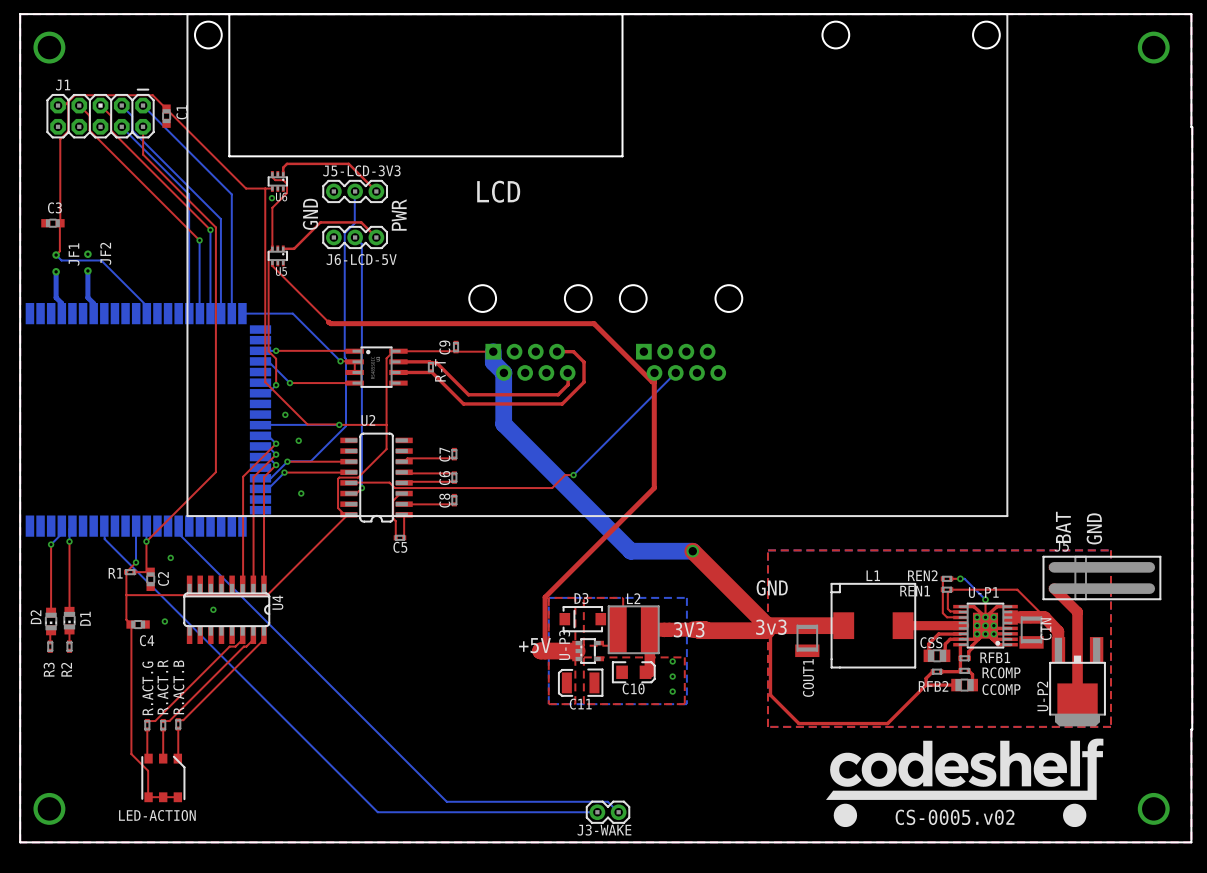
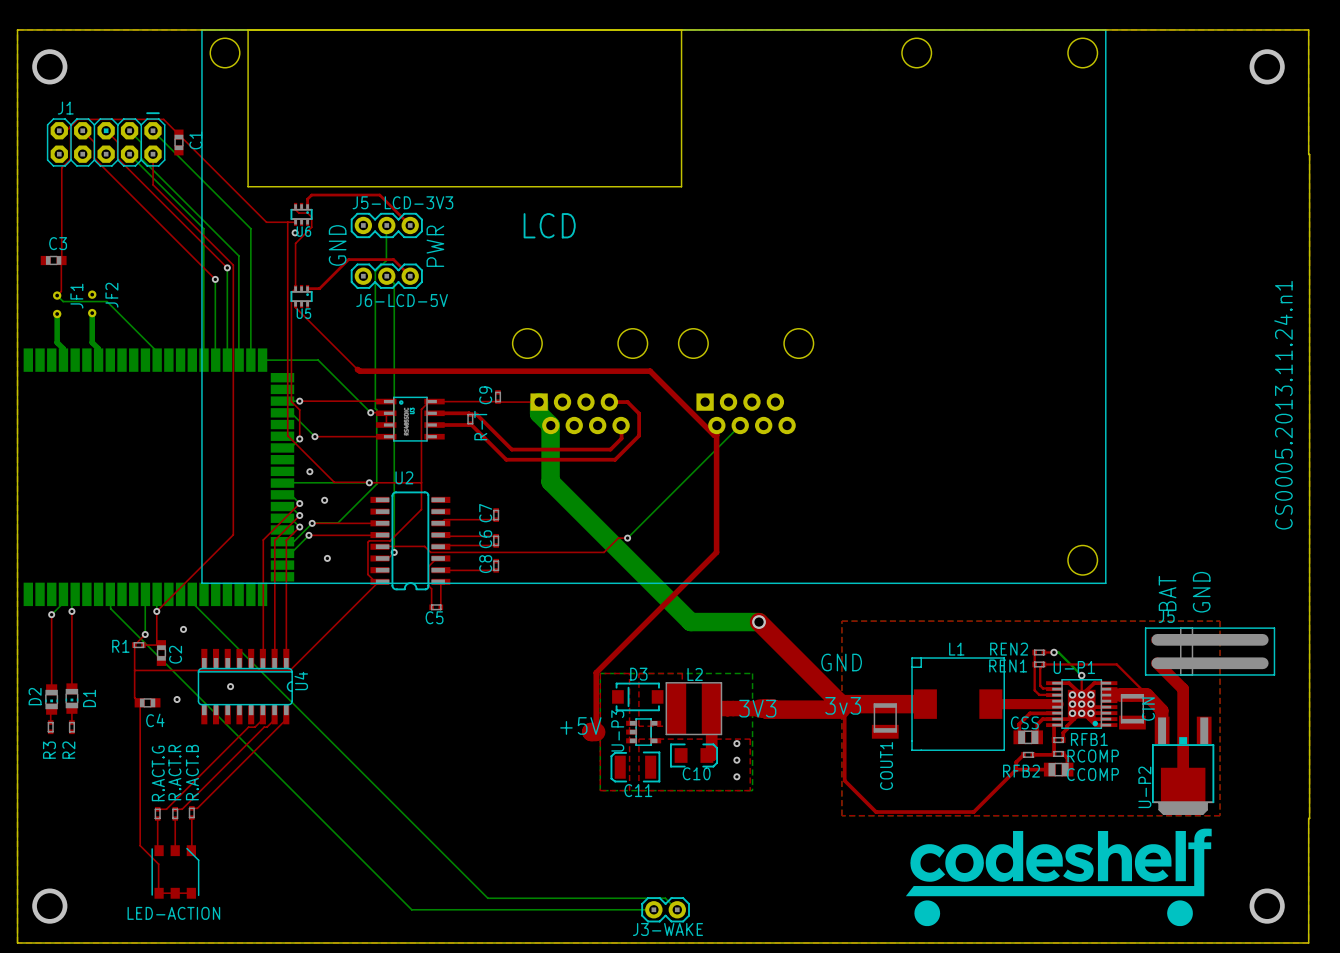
LCD footprint: [186, 13, 1008, 517] -> [201, 29, 1107, 584]
text: none -> CS0005.2013.11.24.n1 (1283, 405)
top track: (545, 651) (577, 651) -> none
text: CS-0005.v02 (955, 817) -> none

